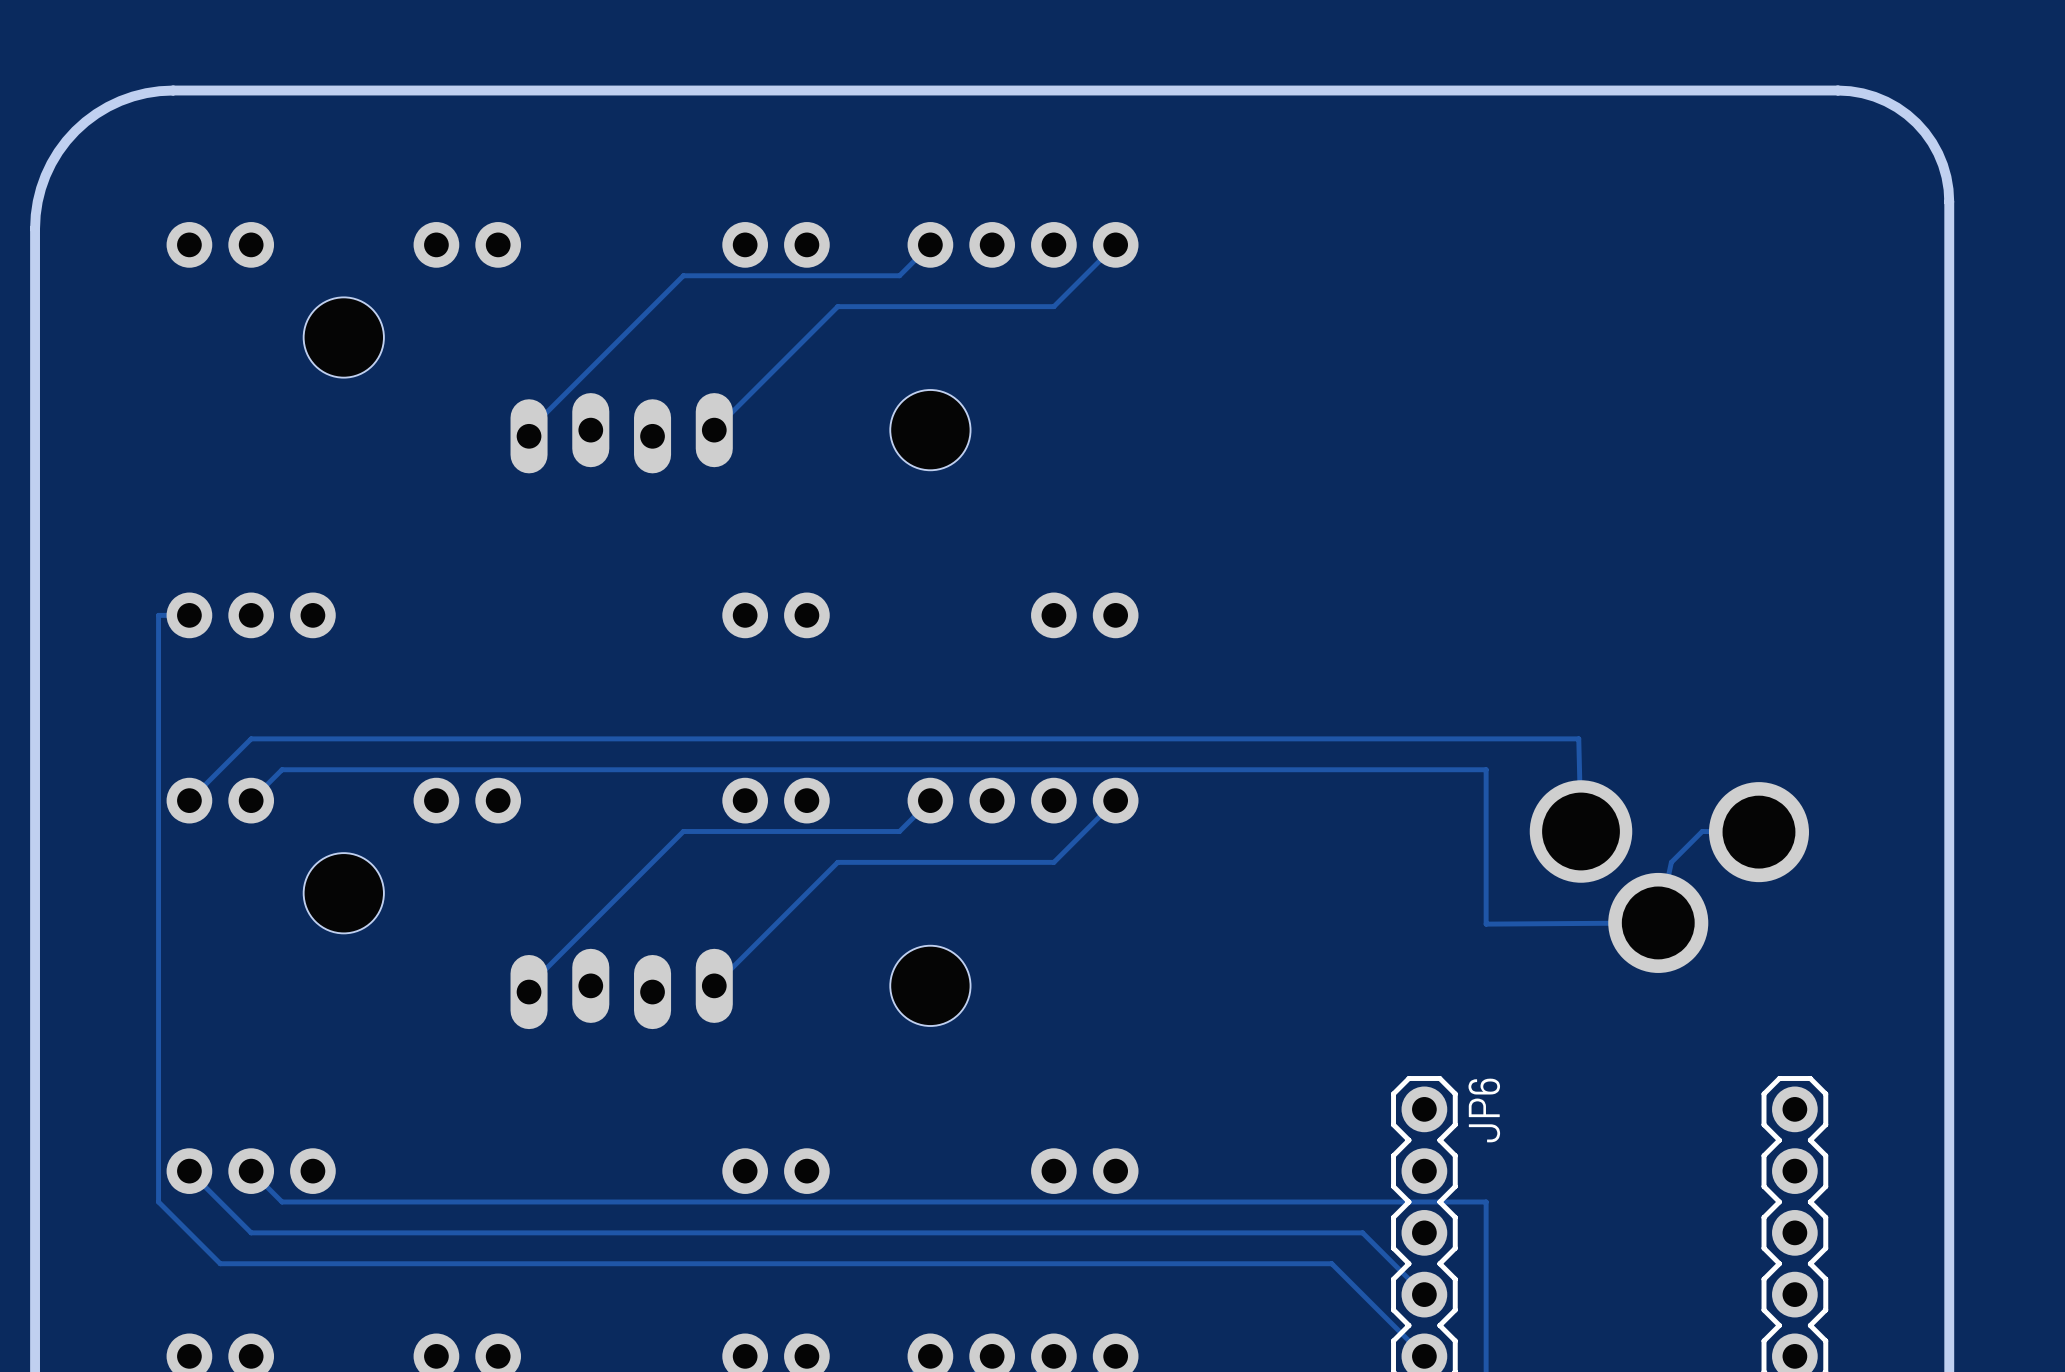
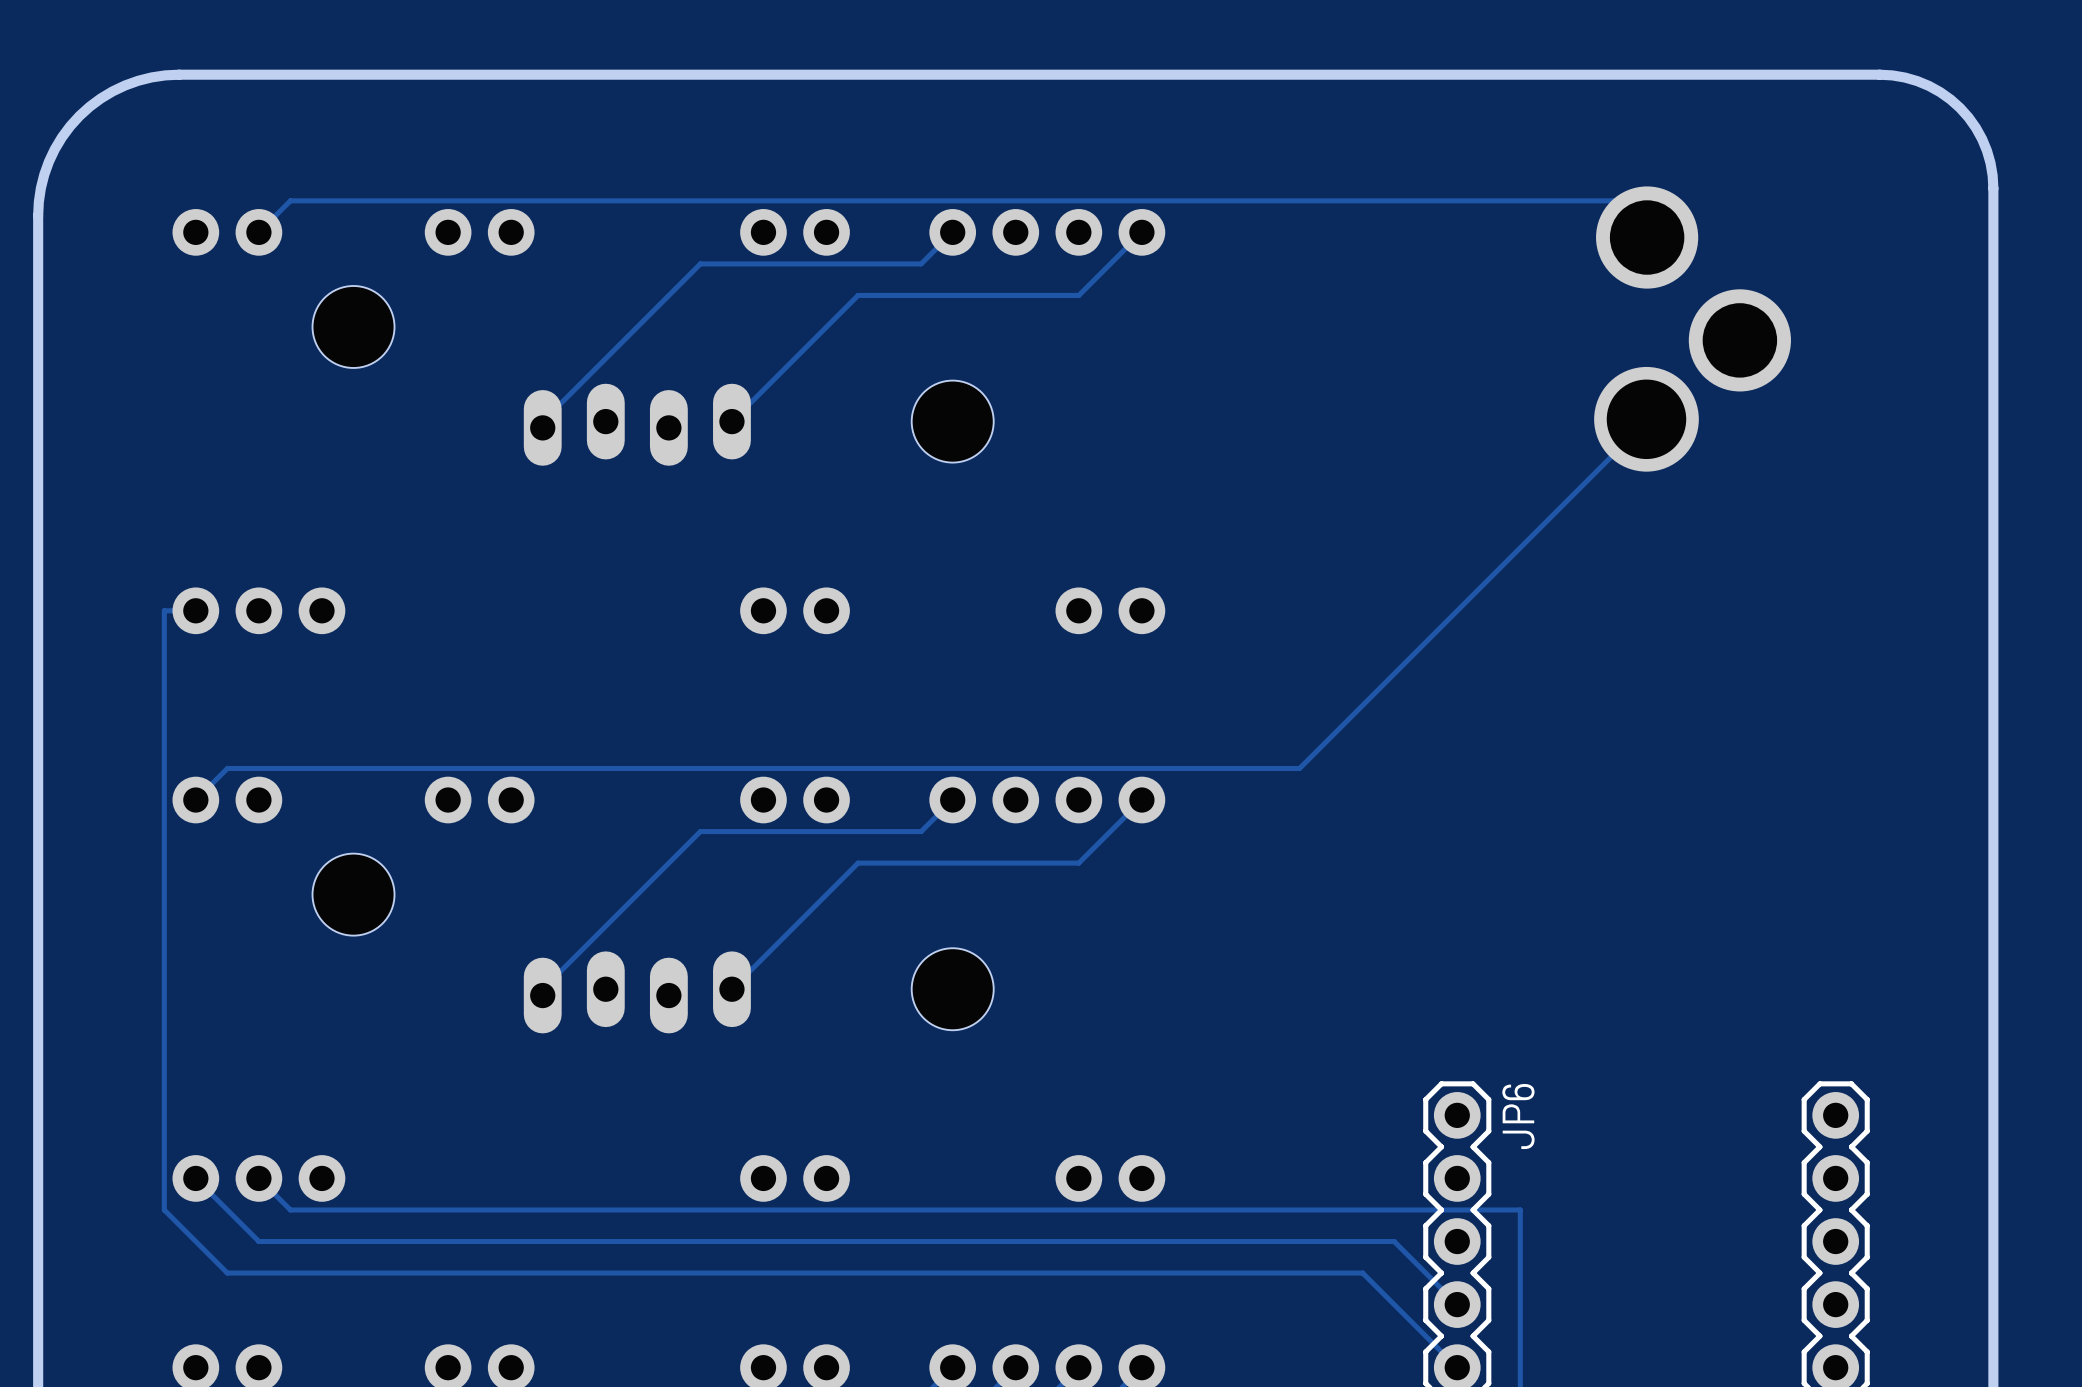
track: none -> (258, 232) (290, 200) (1614, 200) (1646, 232) (1647, 237)
track: (220, 769) (251, 738) (1578, 738) (1581, 831) -> none
track: (282, 769) (251, 800) -> (290, 768) (227, 768)
track: (1270, 769) (1486, 769) (1486, 924) (1658, 922) (1671, 862) (1702, 831) (1758, 832) -> (1299, 768) (1646, 421) (1646, 419)
part rotation: 0° (1669, 876) -> 90° counterclockwise (1692, 329)
part position: (1669, 876) -> (1692, 329)

